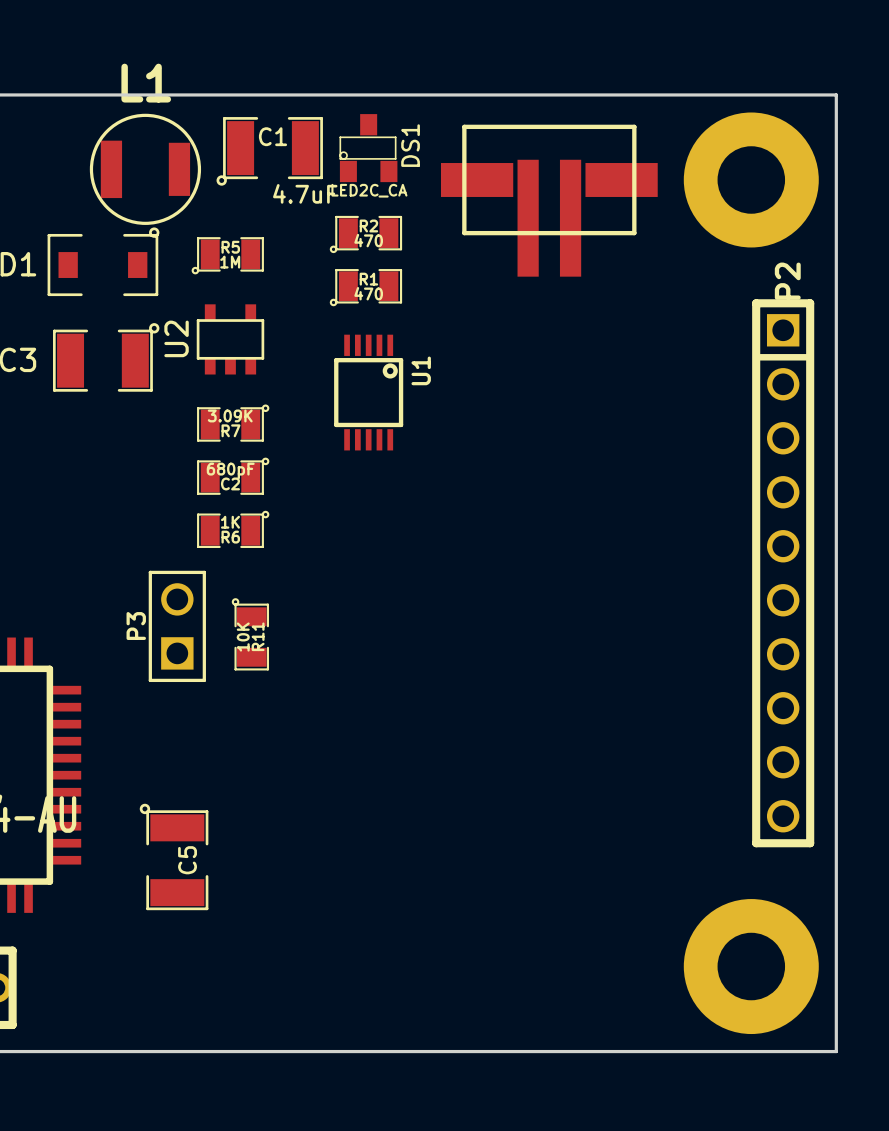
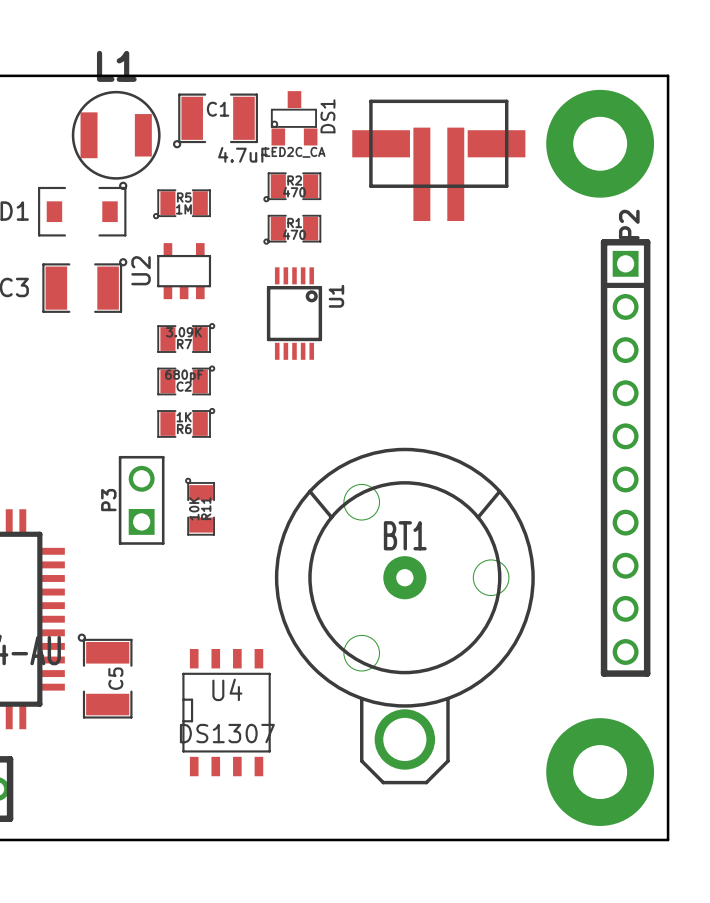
BT1: none -> (404, 616)
C5 position: (174, 856) -> (105, 676)
U4: none -> DS1307 (226, 712)

